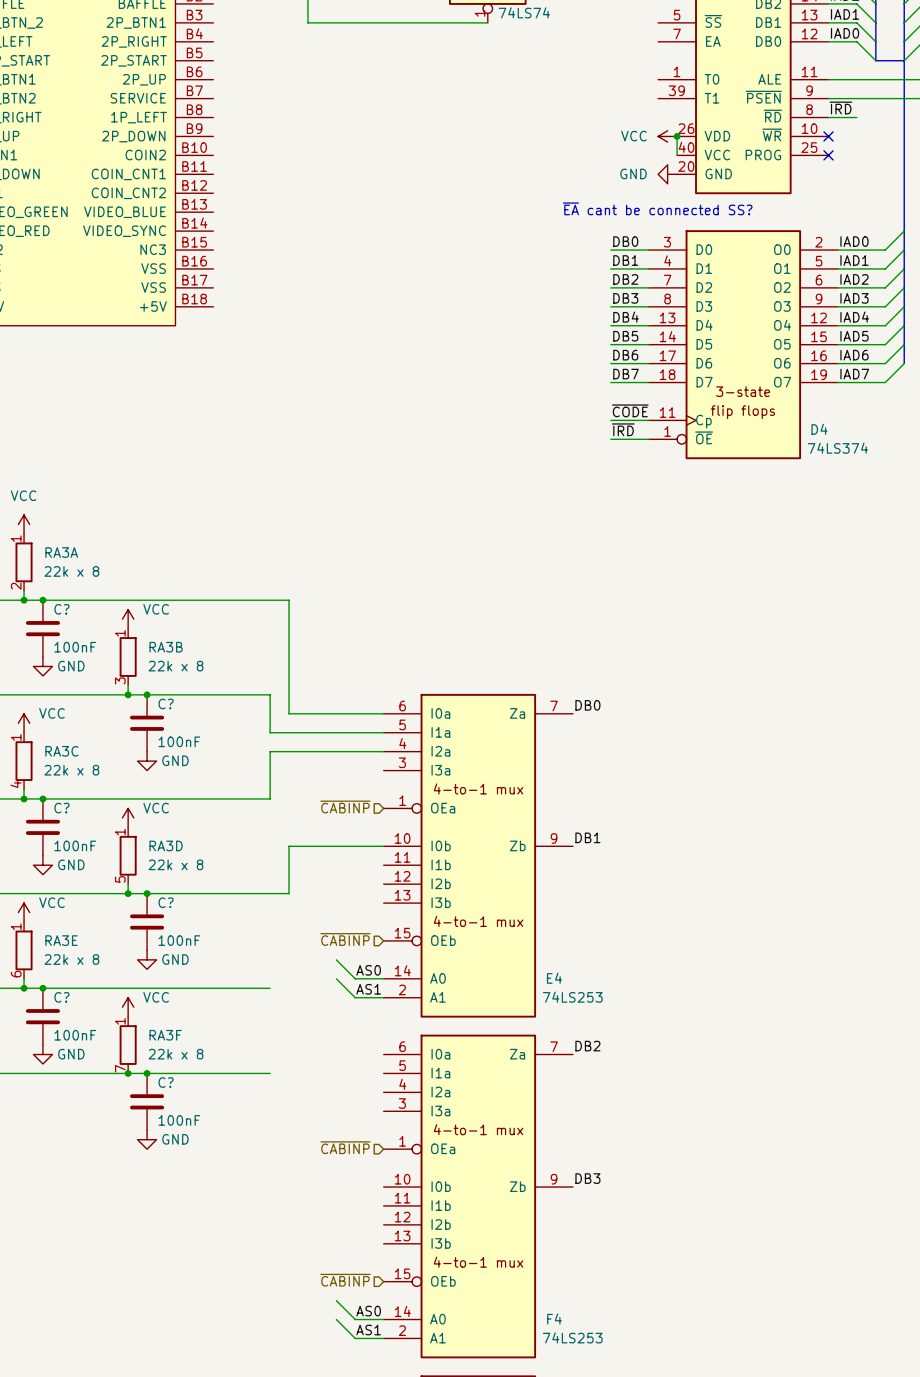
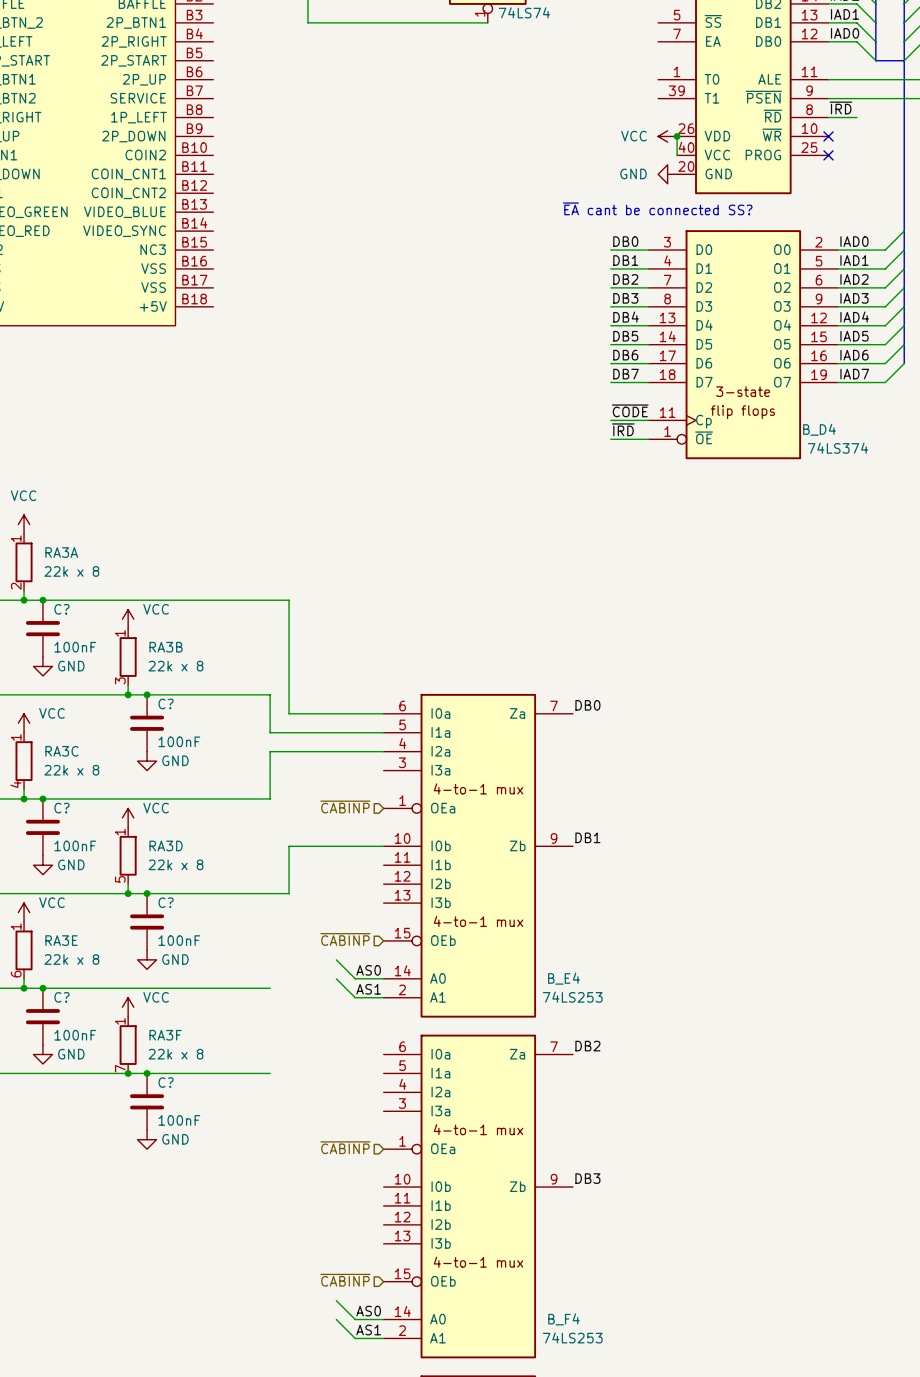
D4 name: D4 (819, 429) -> B_D4 (819, 429)
E4 name: E4 (554, 978) -> B_E4 (563, 978)
F4 name: F4 (554, 1318) -> B_F4 (563, 1319)

